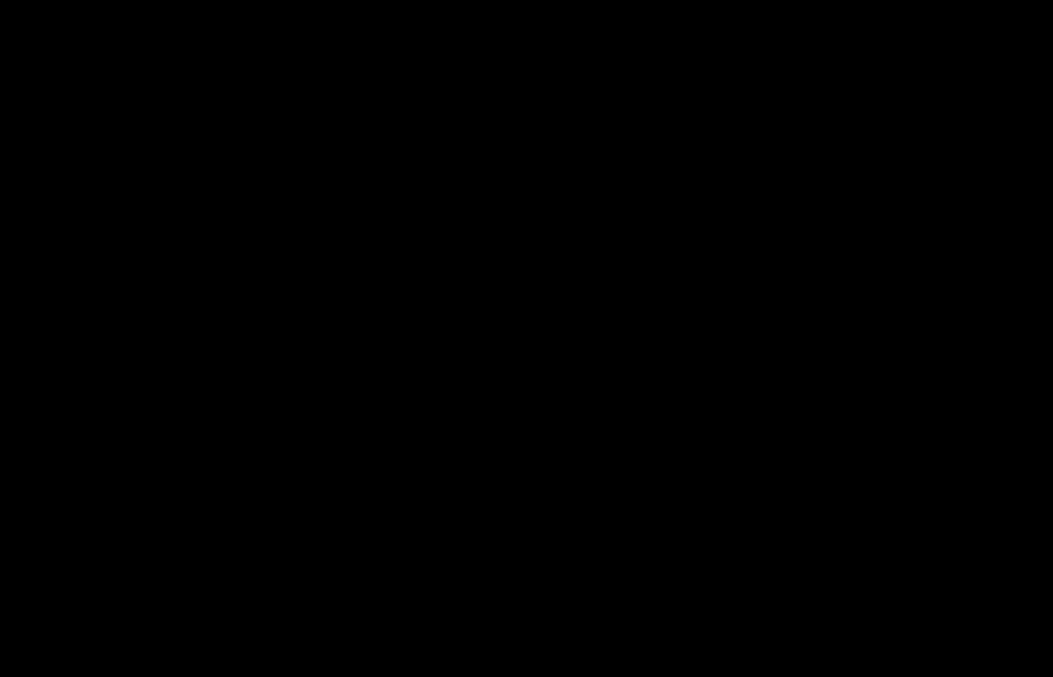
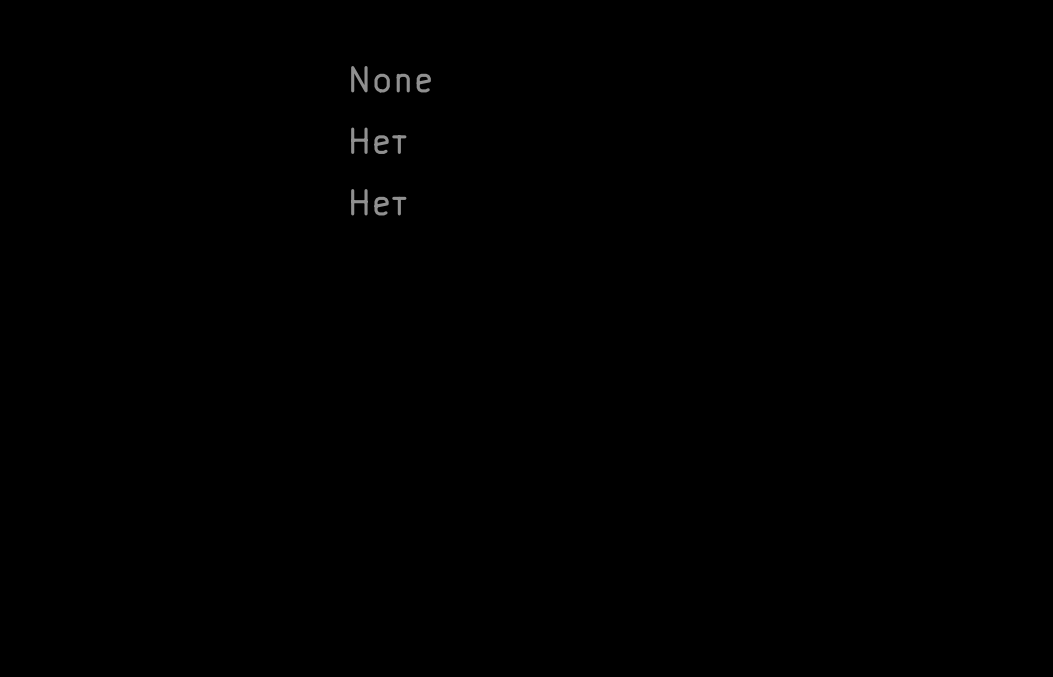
text: none -> None (391, 79)
text: none -> Нет (378, 140)
text: none -> Нет (378, 202)

